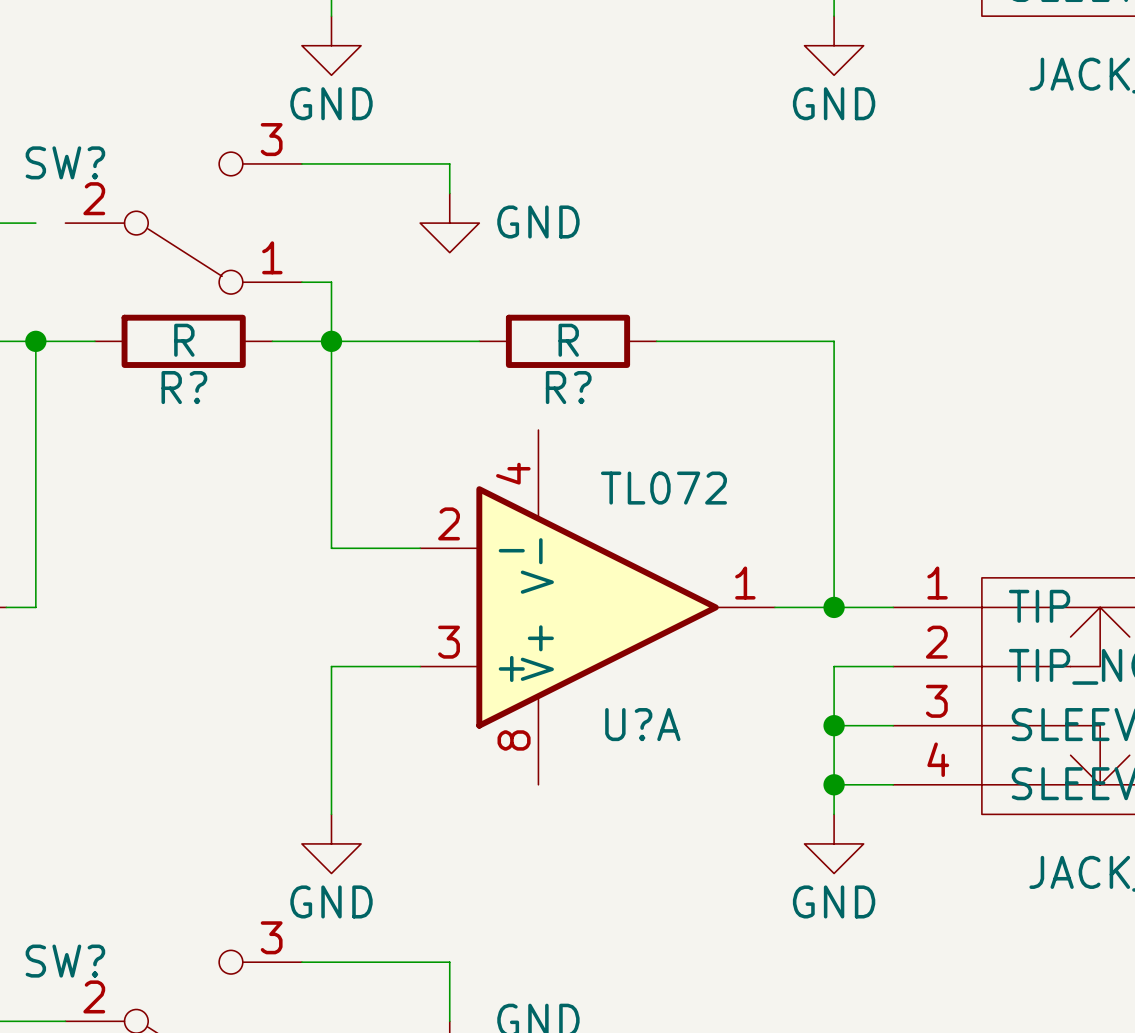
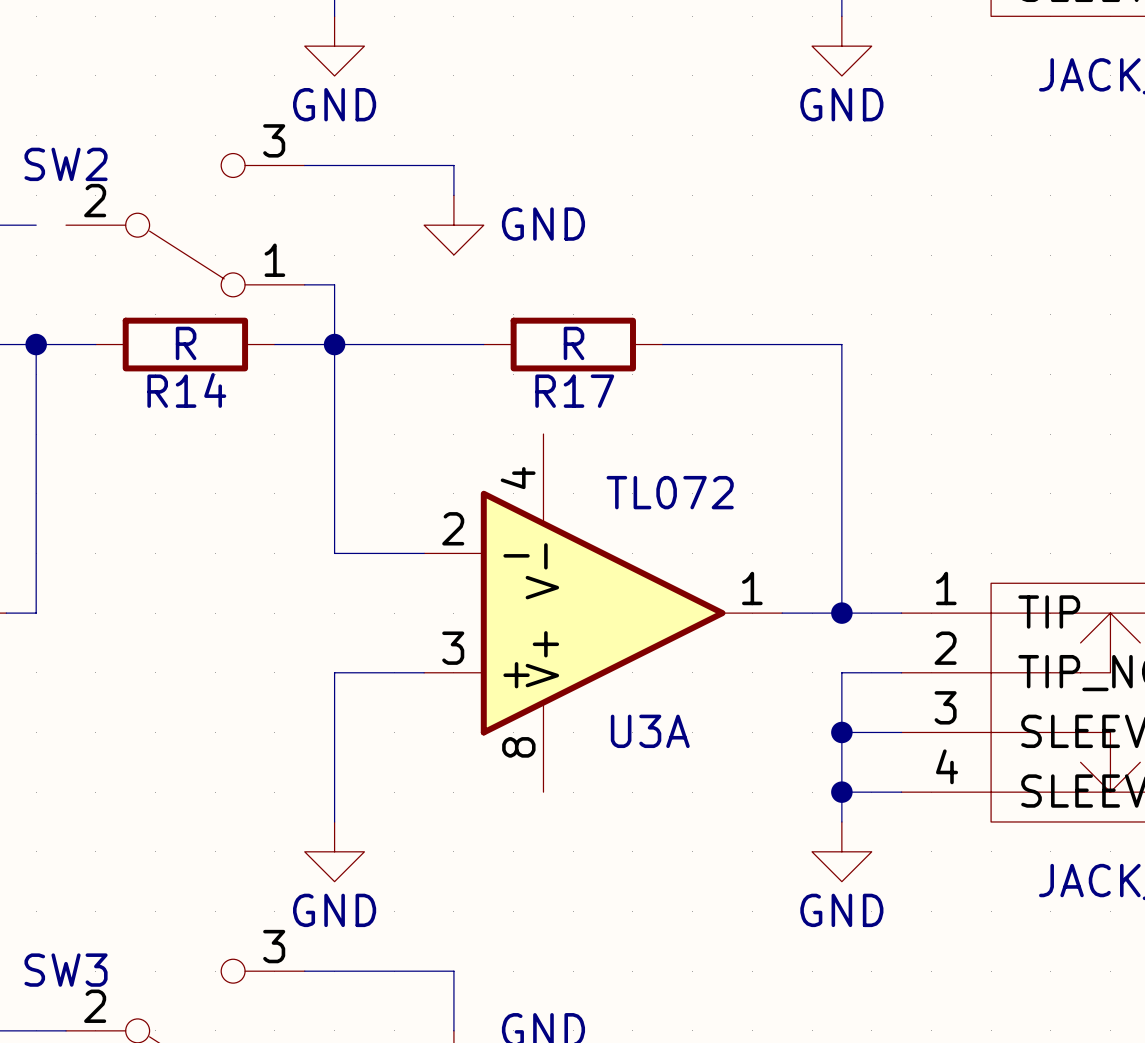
SW? name: SW? (65, 162) -> SW2 (66, 164)
R? name: R? (184, 387) -> R14 (186, 390)
R? name: R? (568, 387) -> R17 (574, 391)
U?A name: U?A (642, 724) -> U3A (650, 731)
SW? name: SW? (65, 961) -> SW3 (66, 970)

